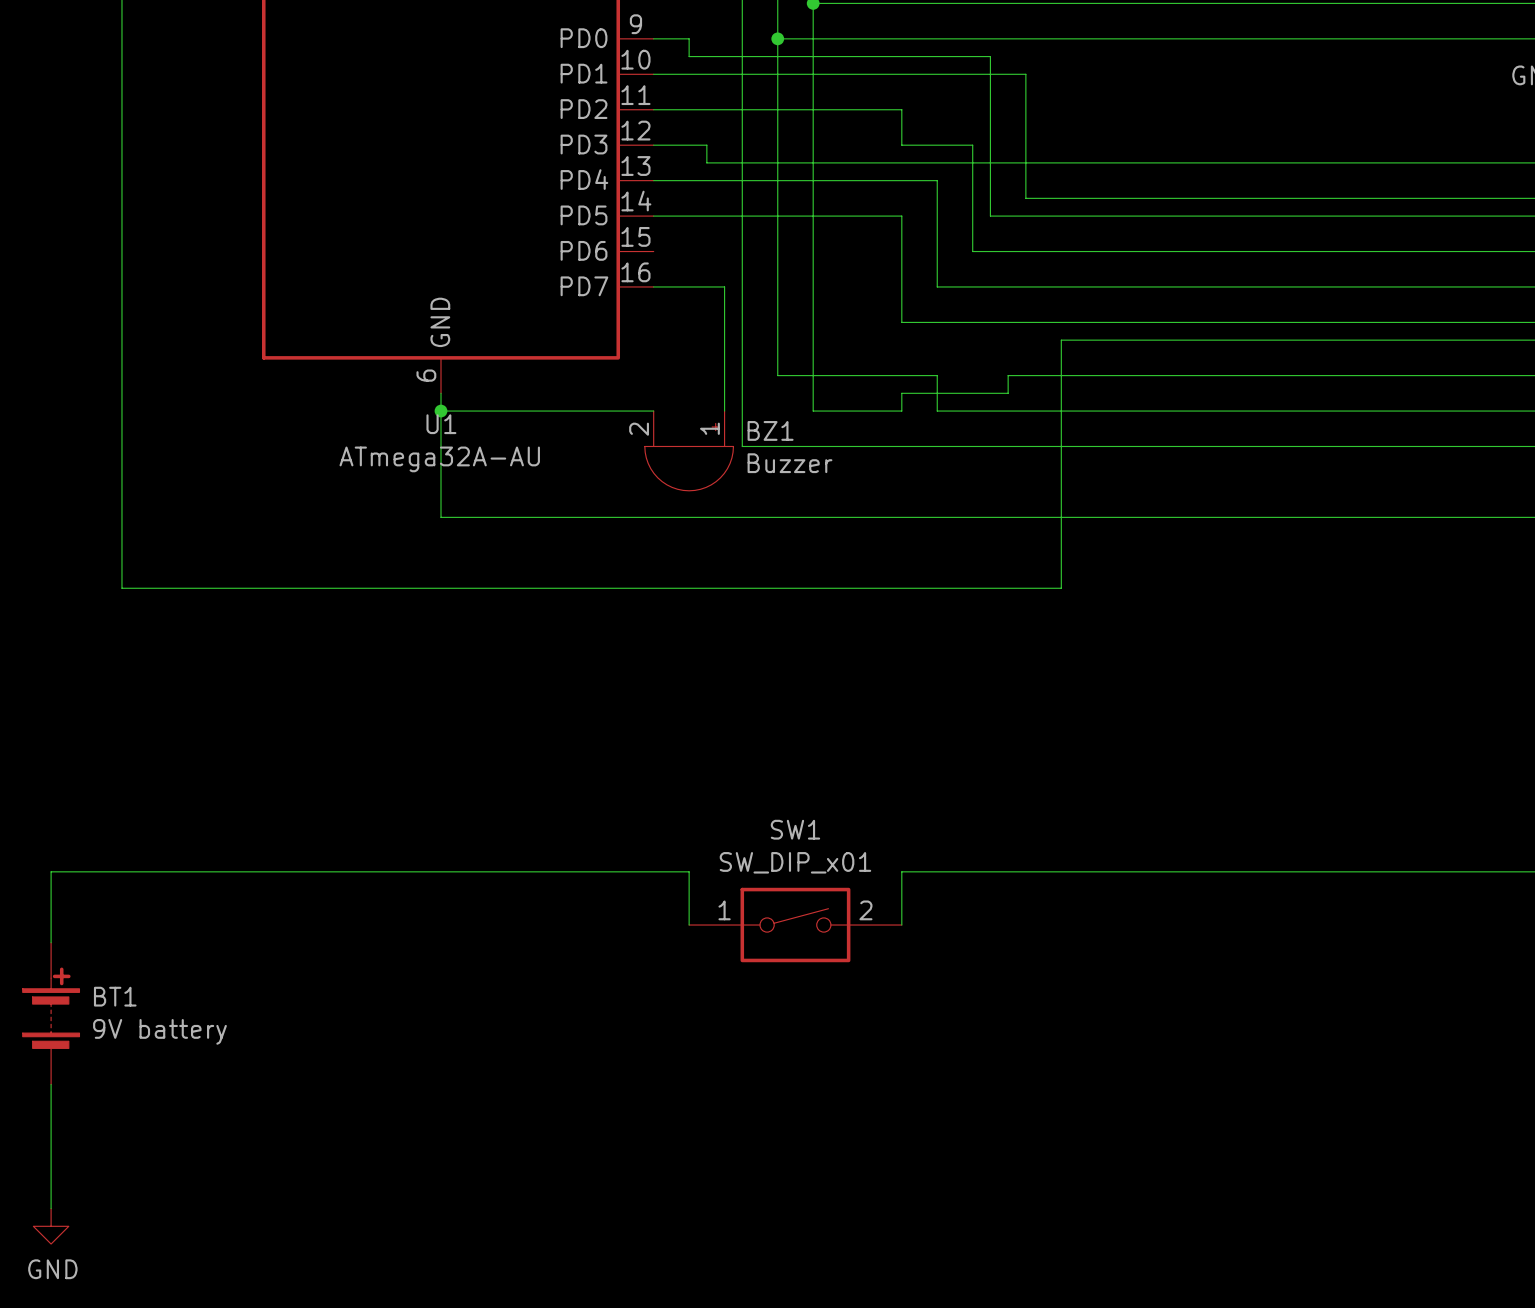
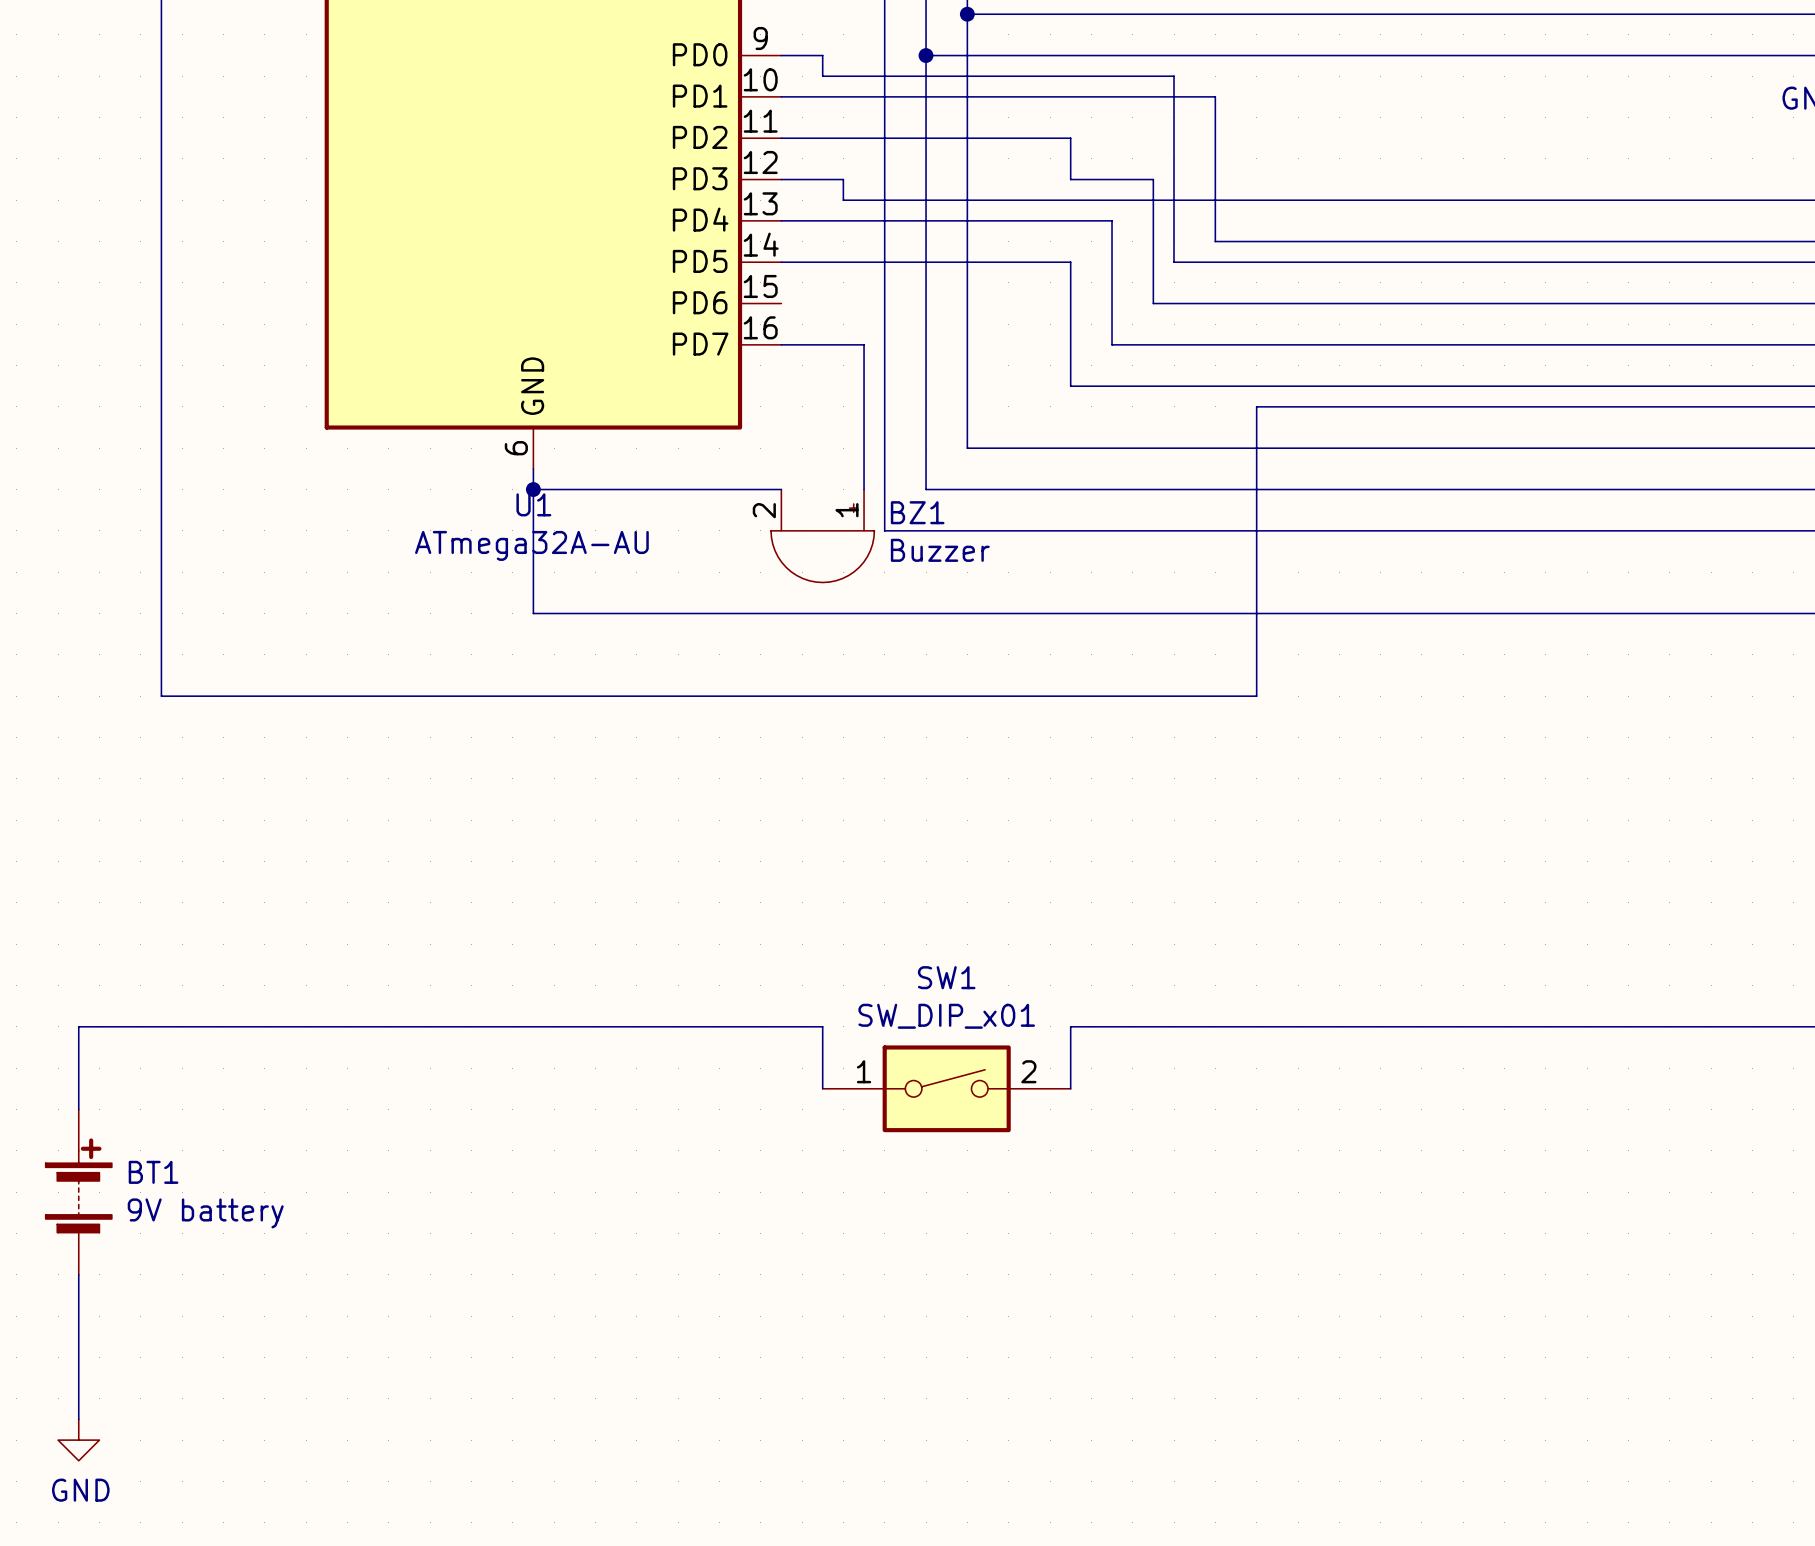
wire: (777, 375) (813, 375) (813, 411) -> (926, 448) (926, 489) (967, 489)
wire: (937, 375) (937, 411) -> (1070, 489) (1112, 489)
wire: (1008, 375) (1008, 393) (901, 393) (901, 411) -> (1194, 448) (1112, 448)

